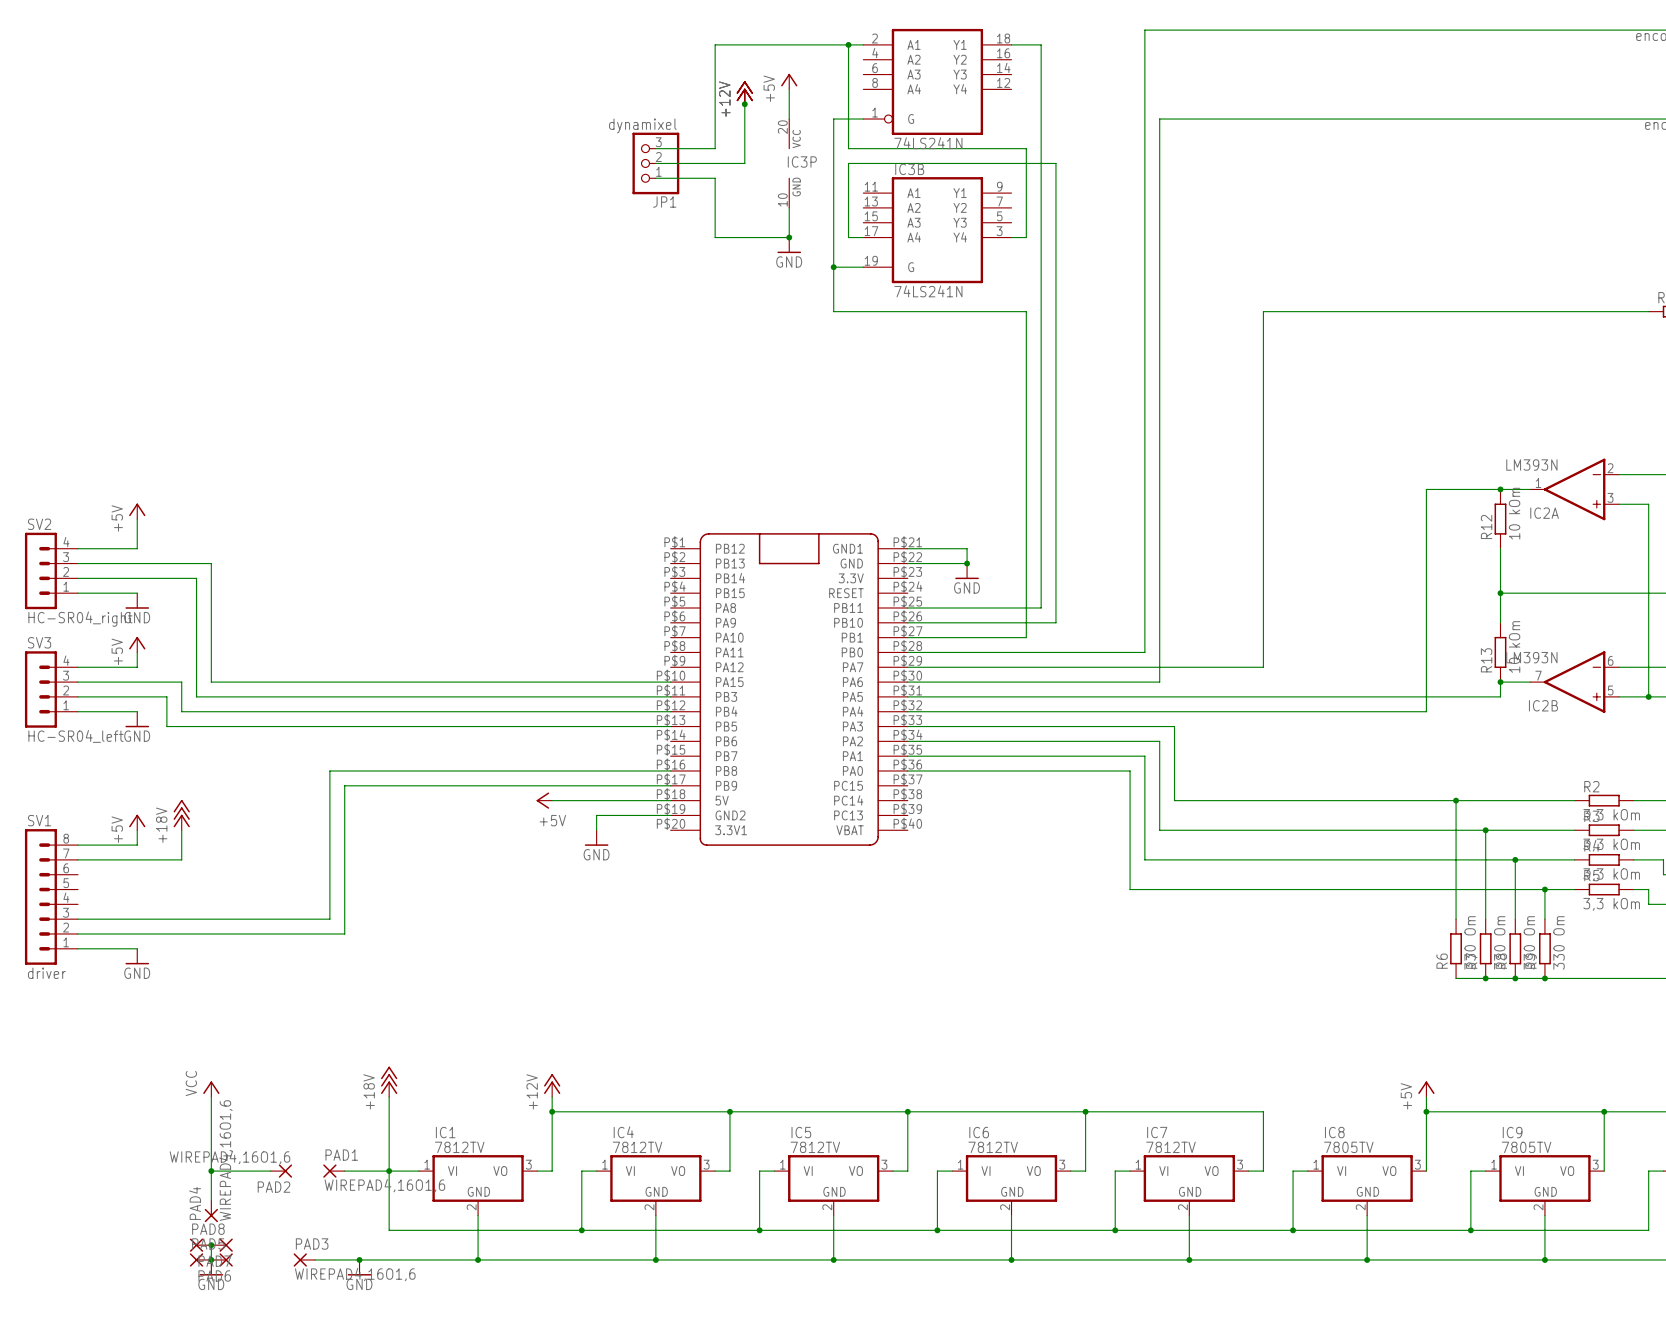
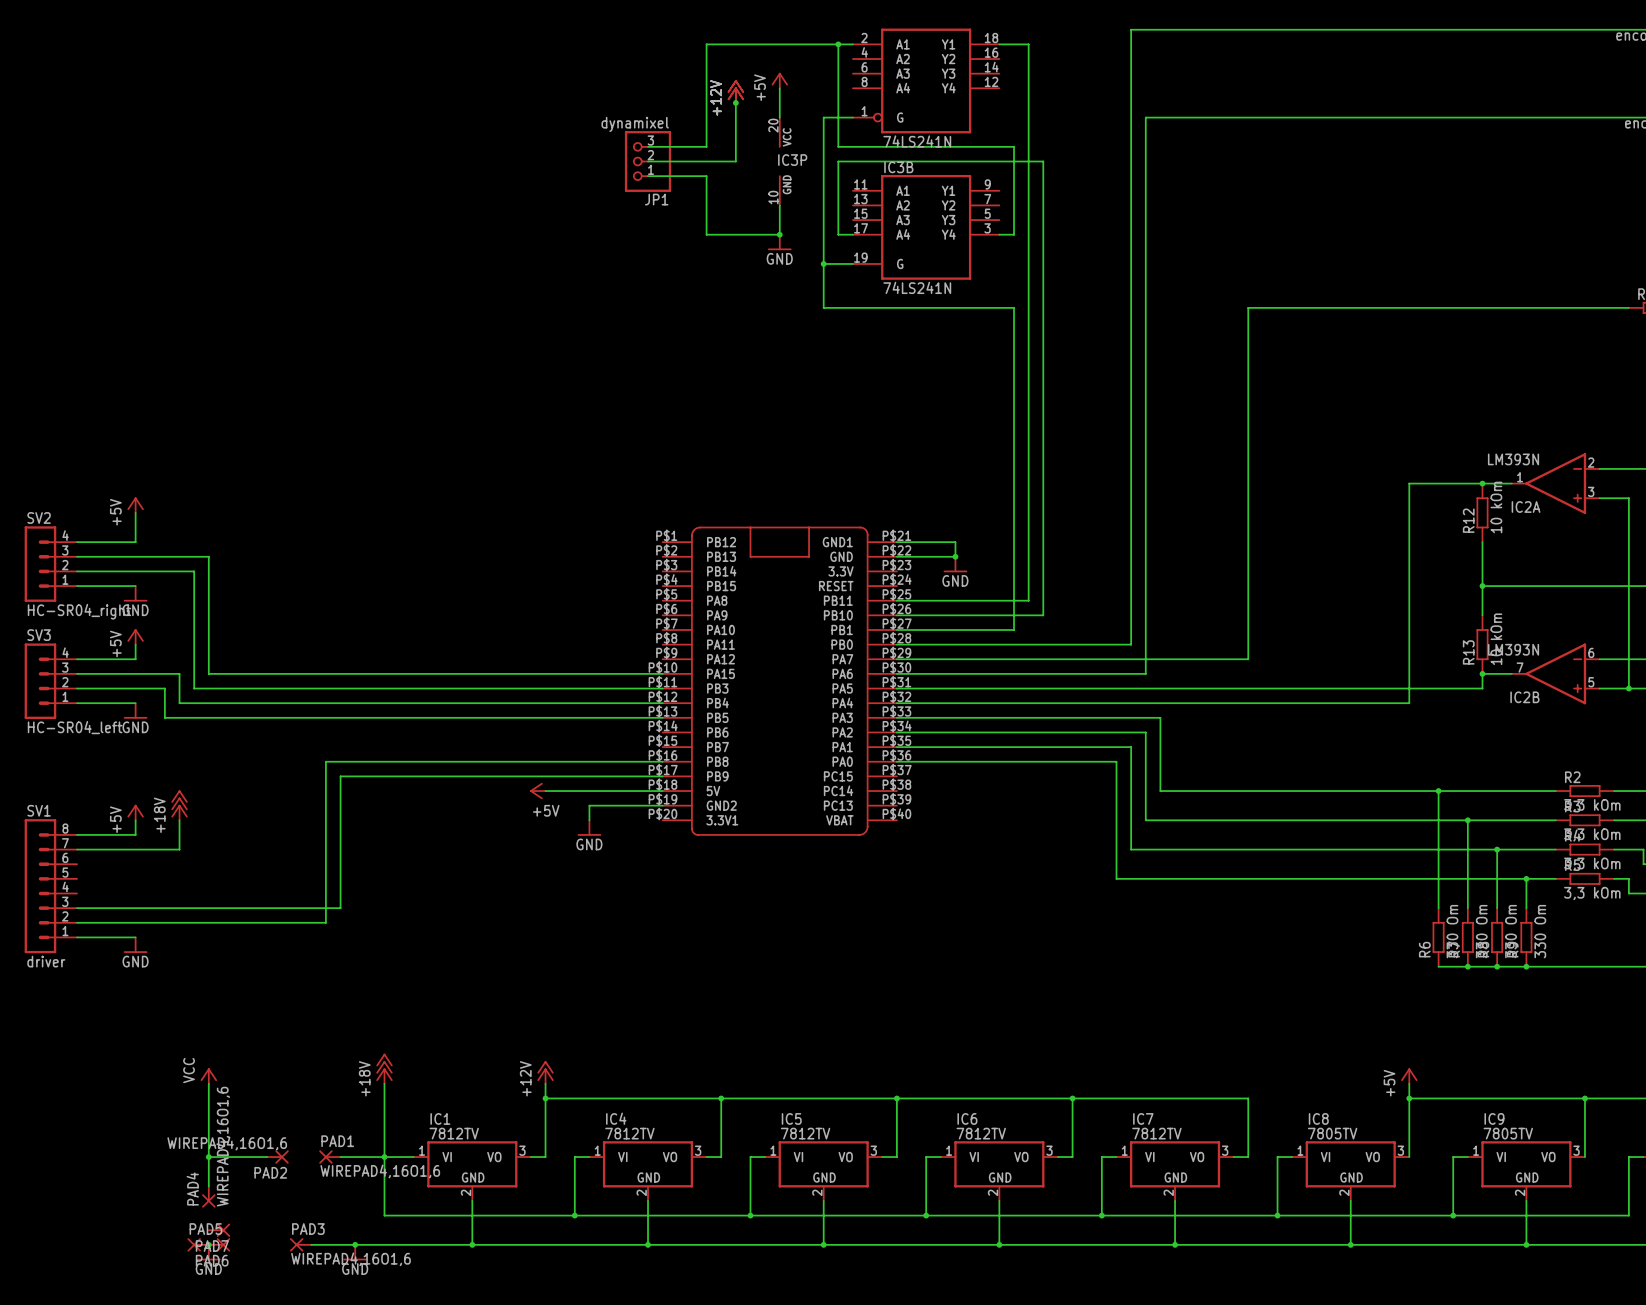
wire: (344, 919) (344, 933) (329, 933) -> (340, 908) (325, 908) (325, 922)
PAD8: (200, 1245) -> none
wire: (211, 1245) (211, 1259) -> none
junction: (211, 1245) -> none

